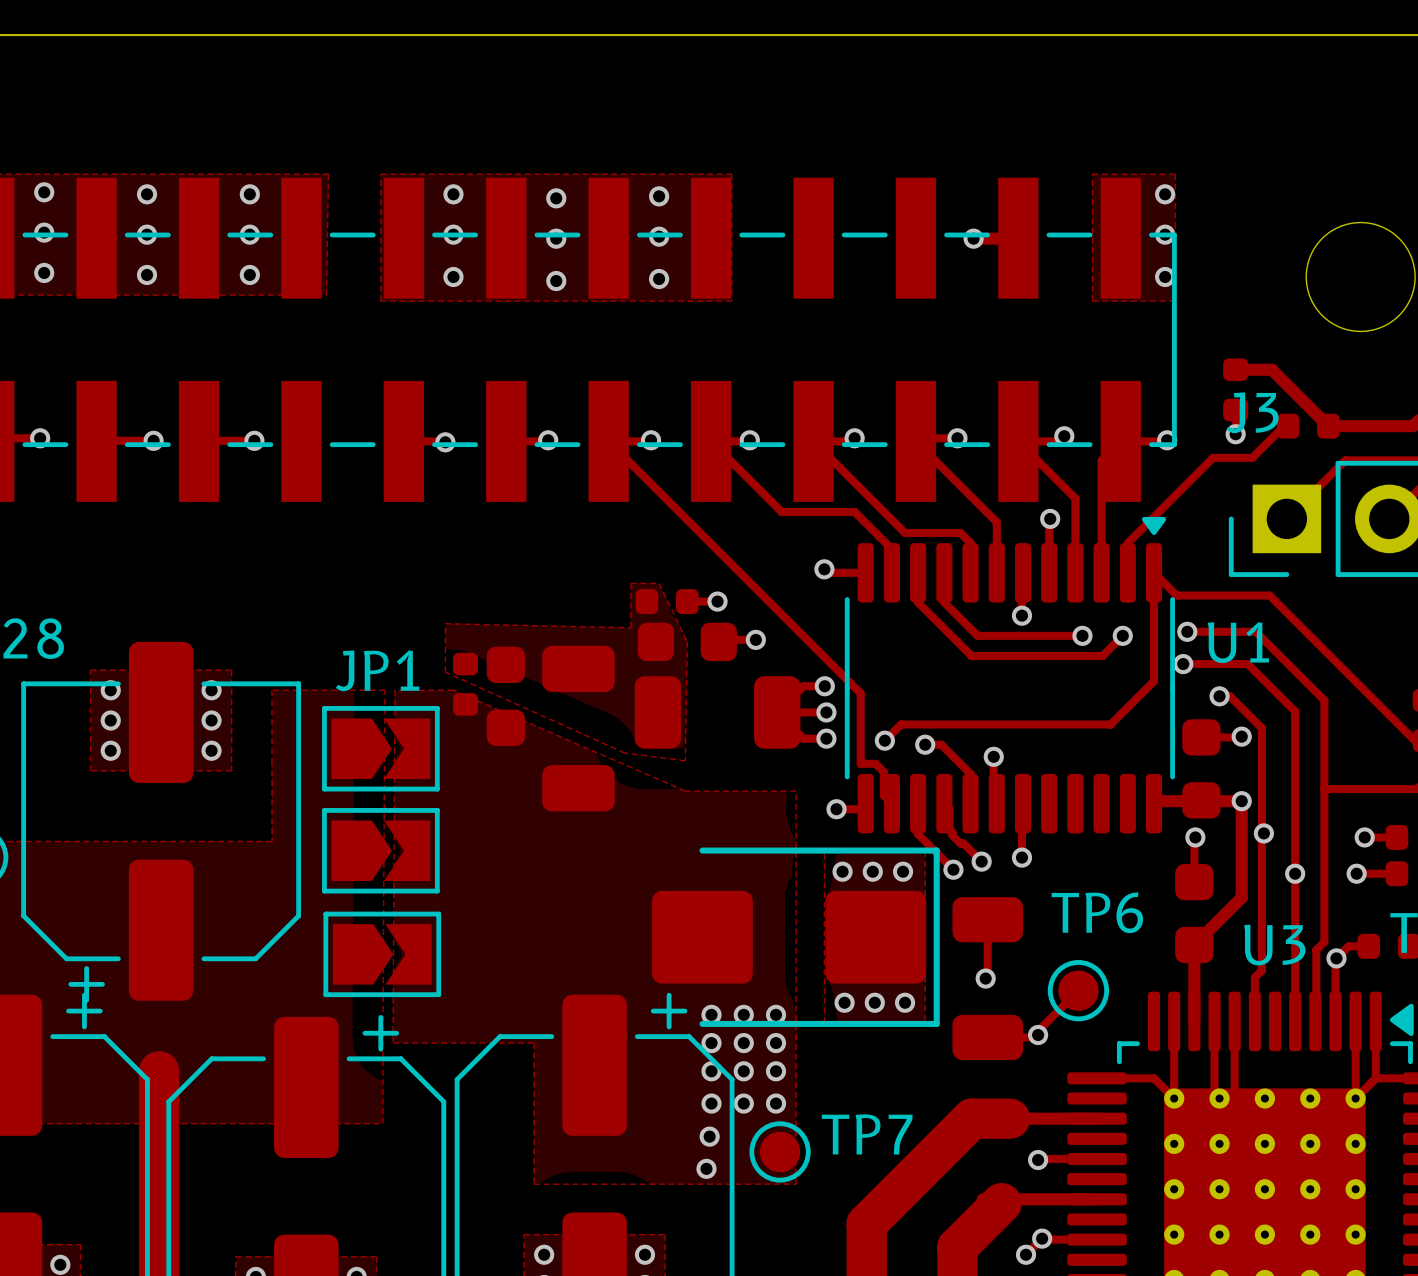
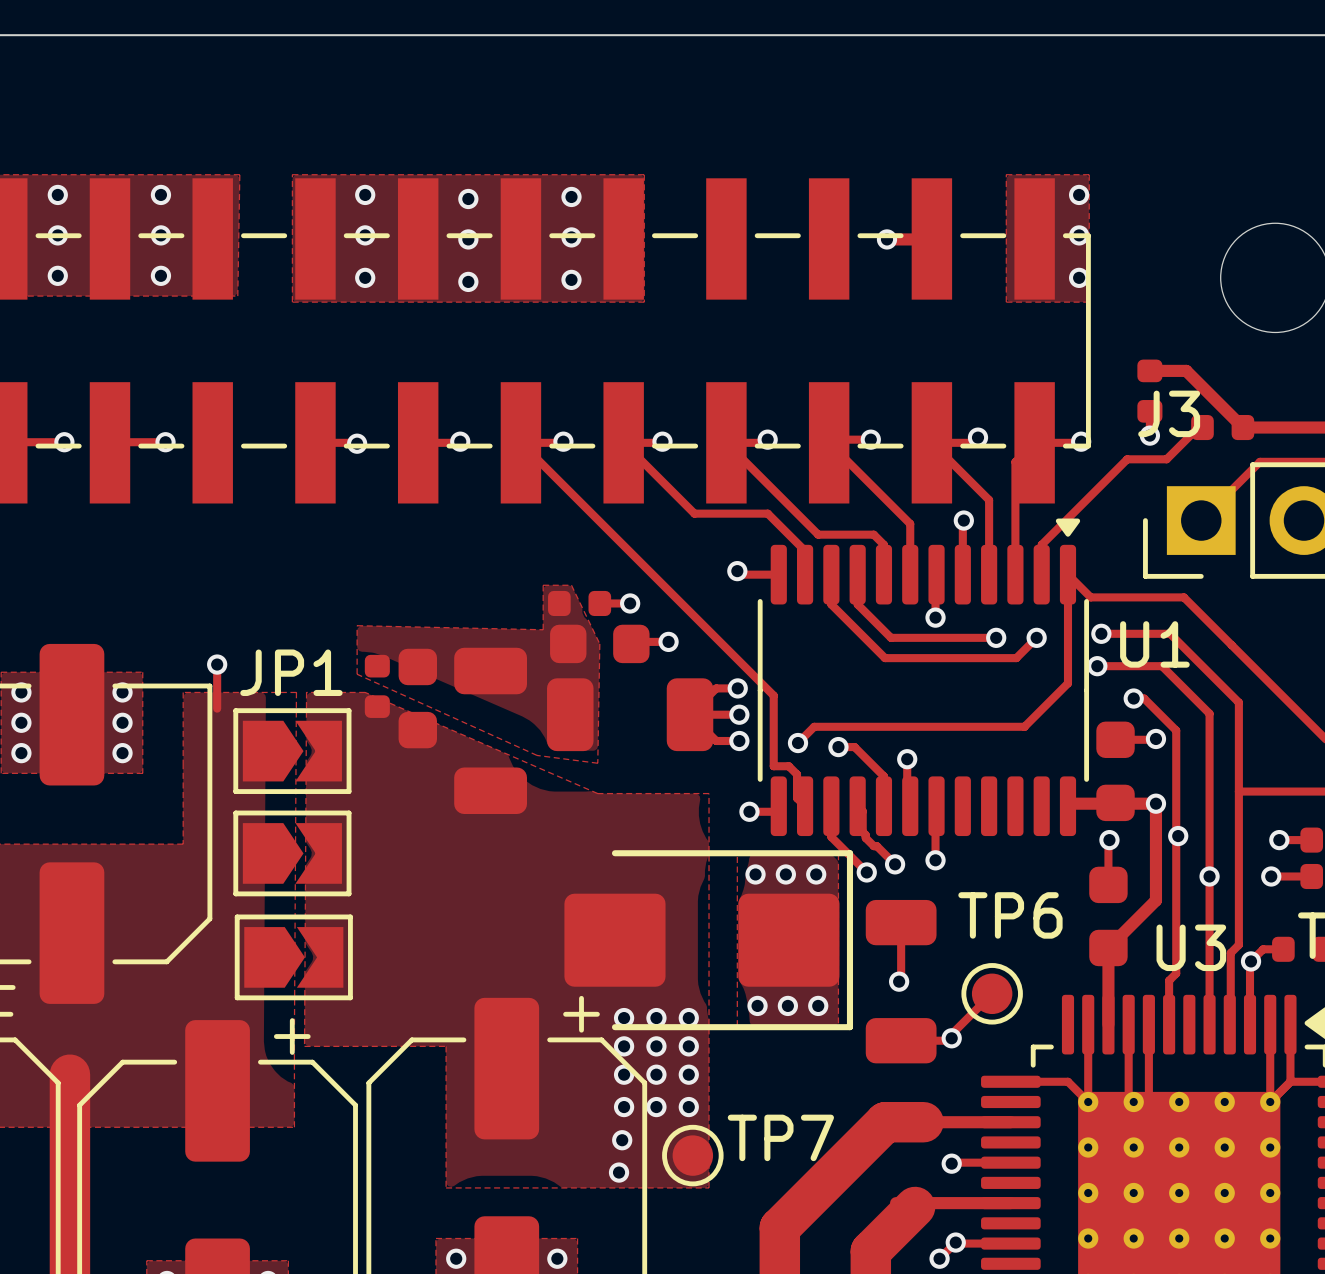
track: none -> (217, 664) (217, 708)
via: none -> (217, 664)

